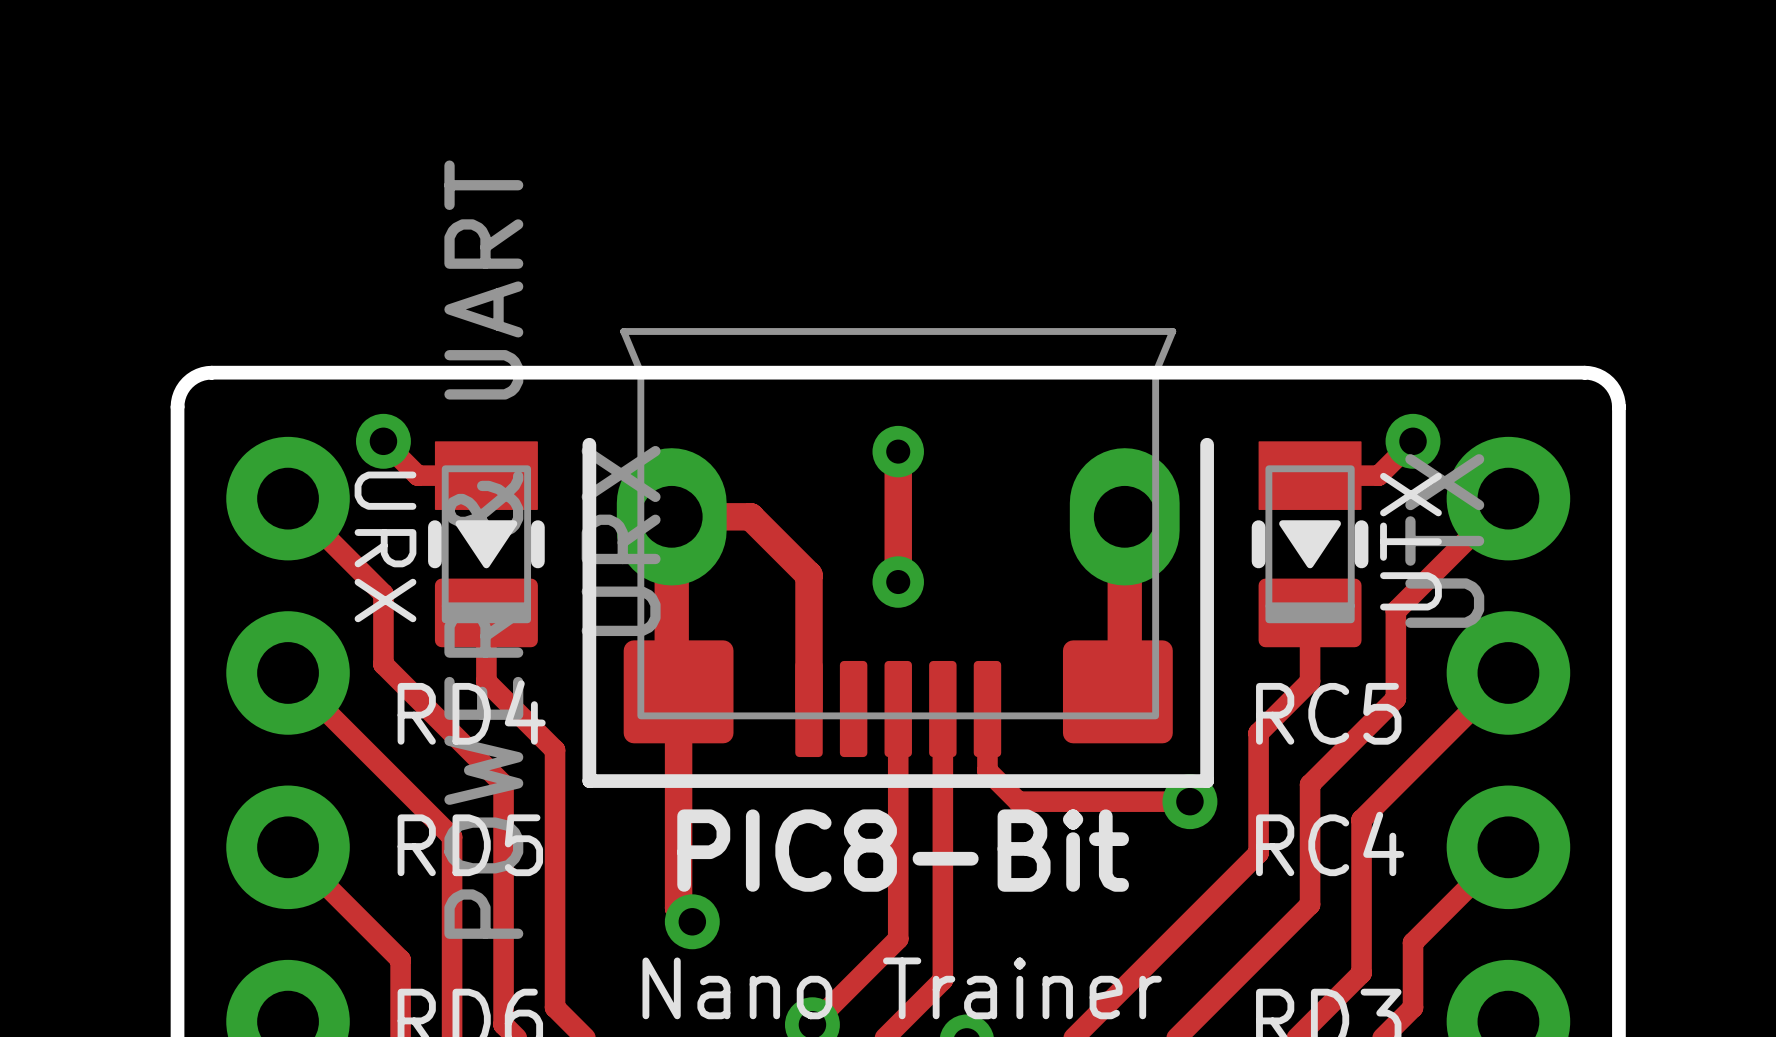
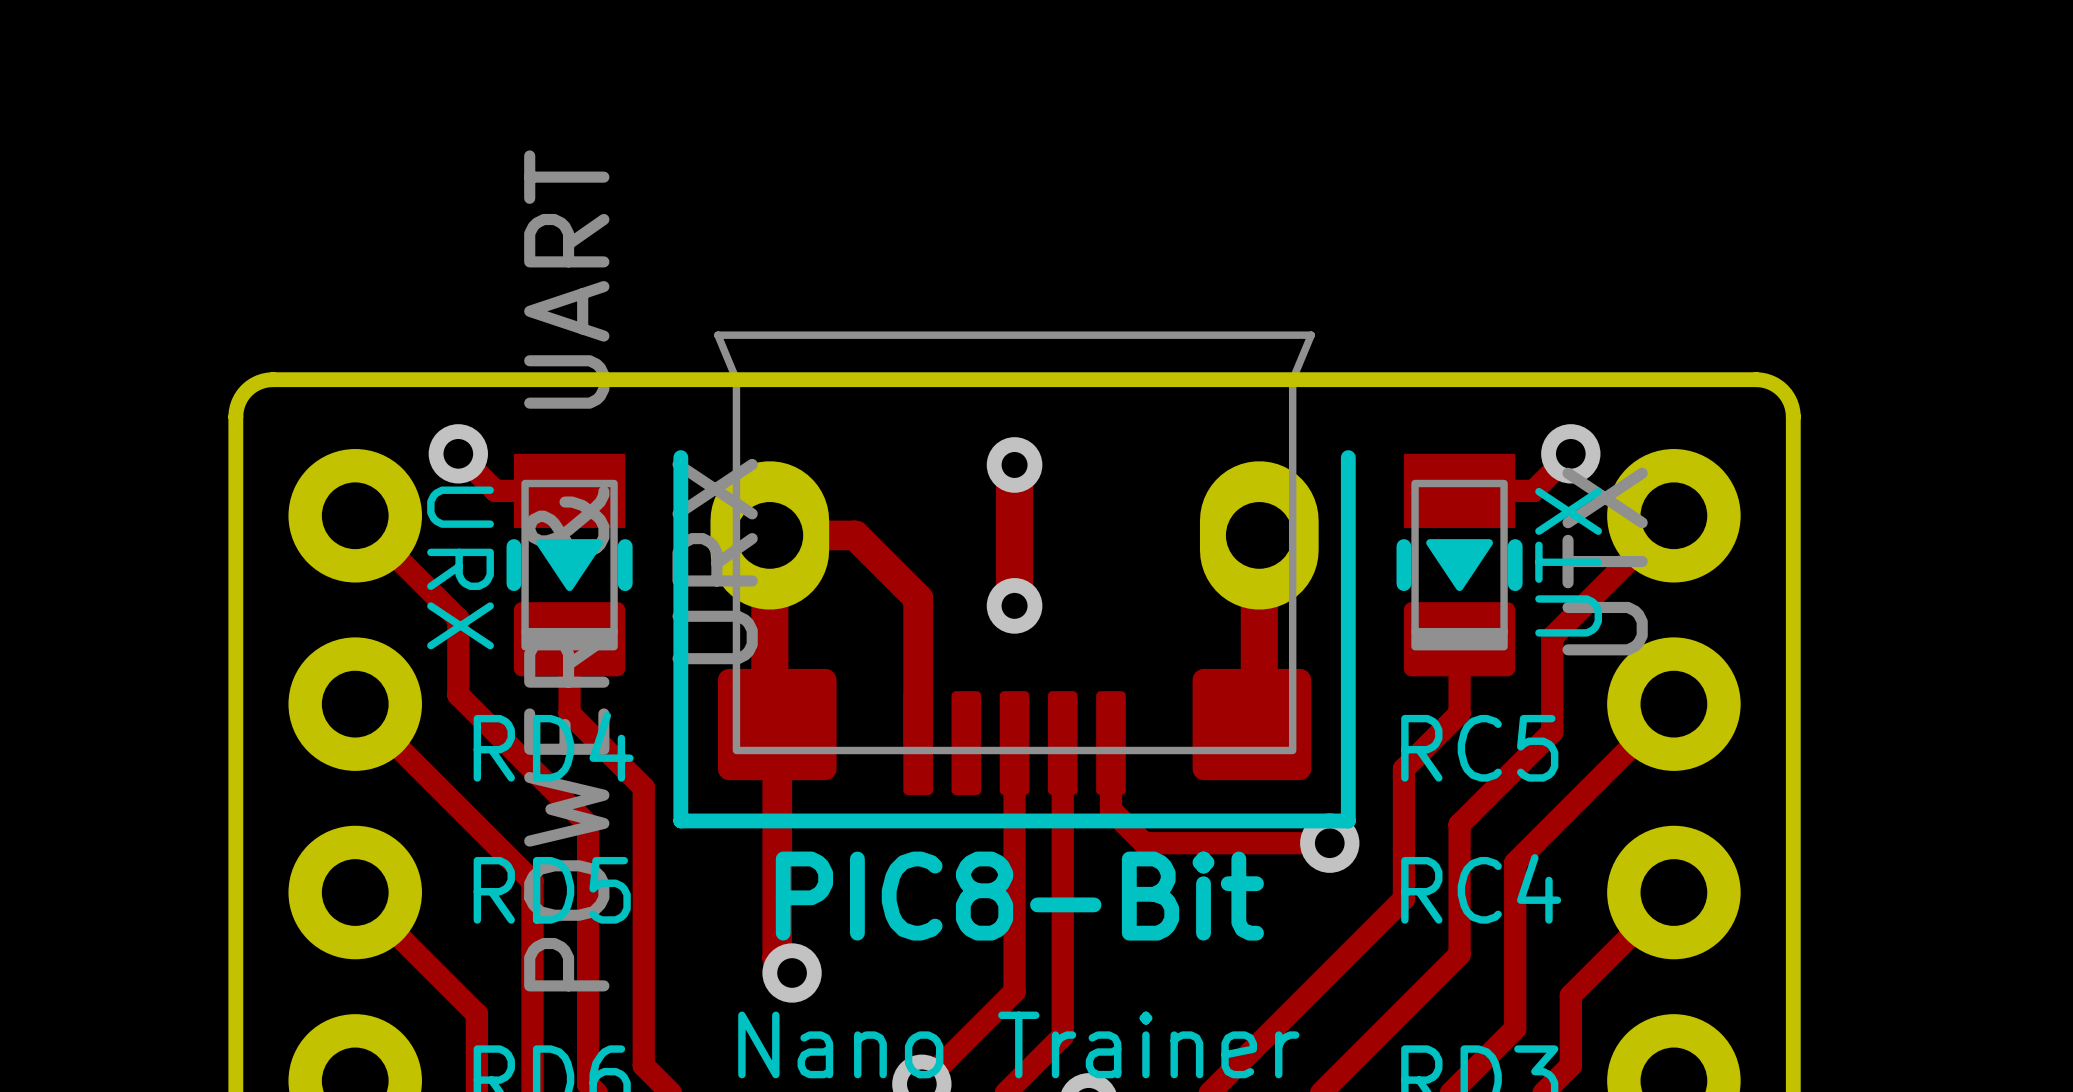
track width: thin (898, 451) (898, 582) -> thick (1014, 464) (1014, 605)

